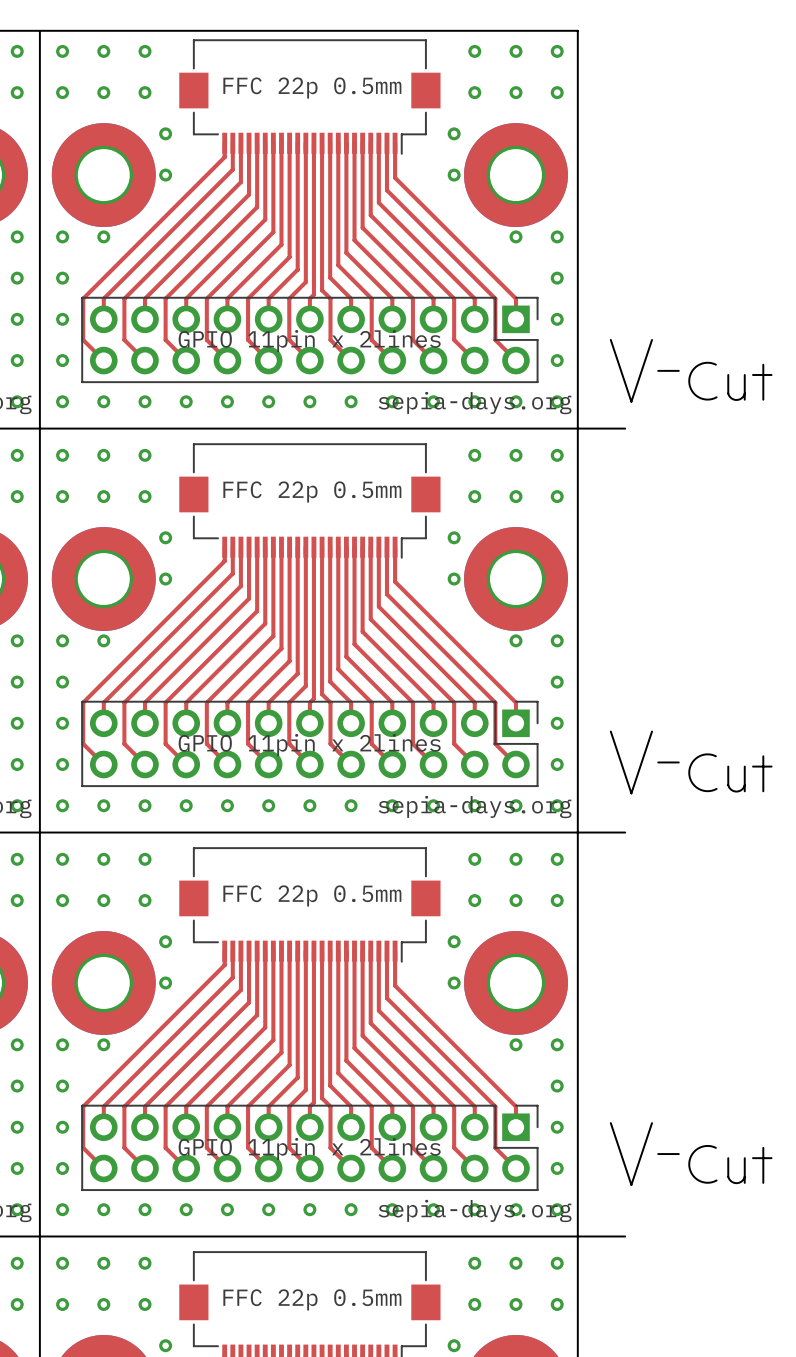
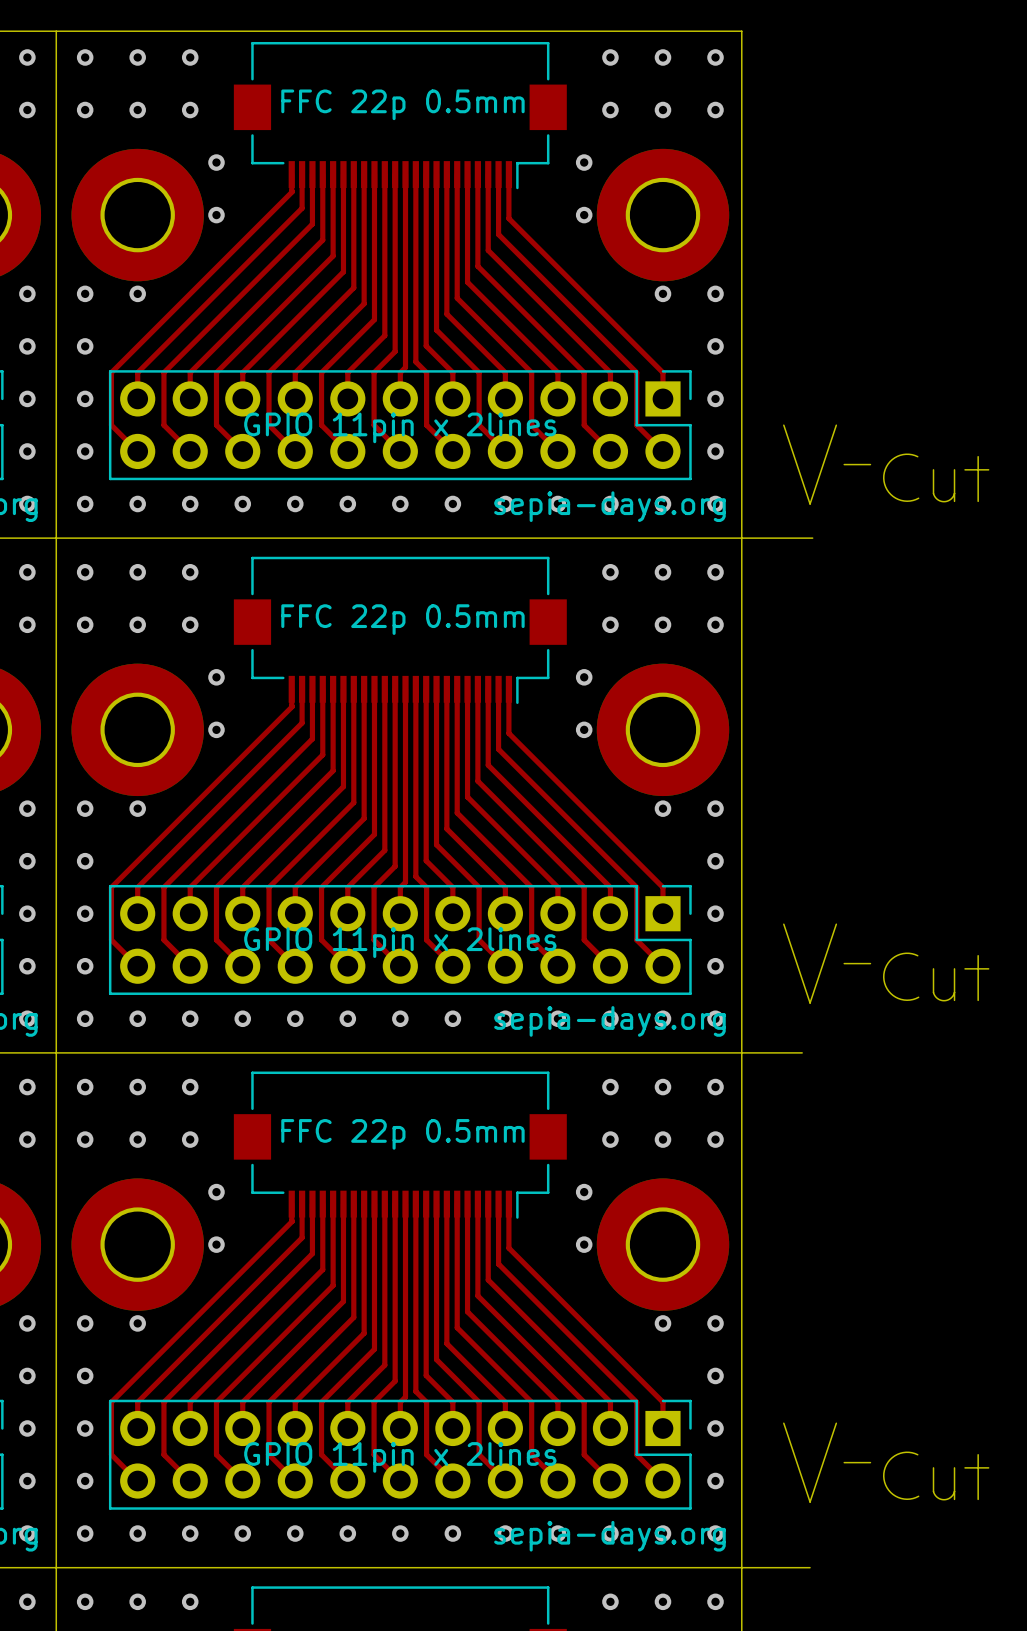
board edge: none -> (802, 538) (812, 538)
board edge: none -> (802, 1567) (810, 1567)

